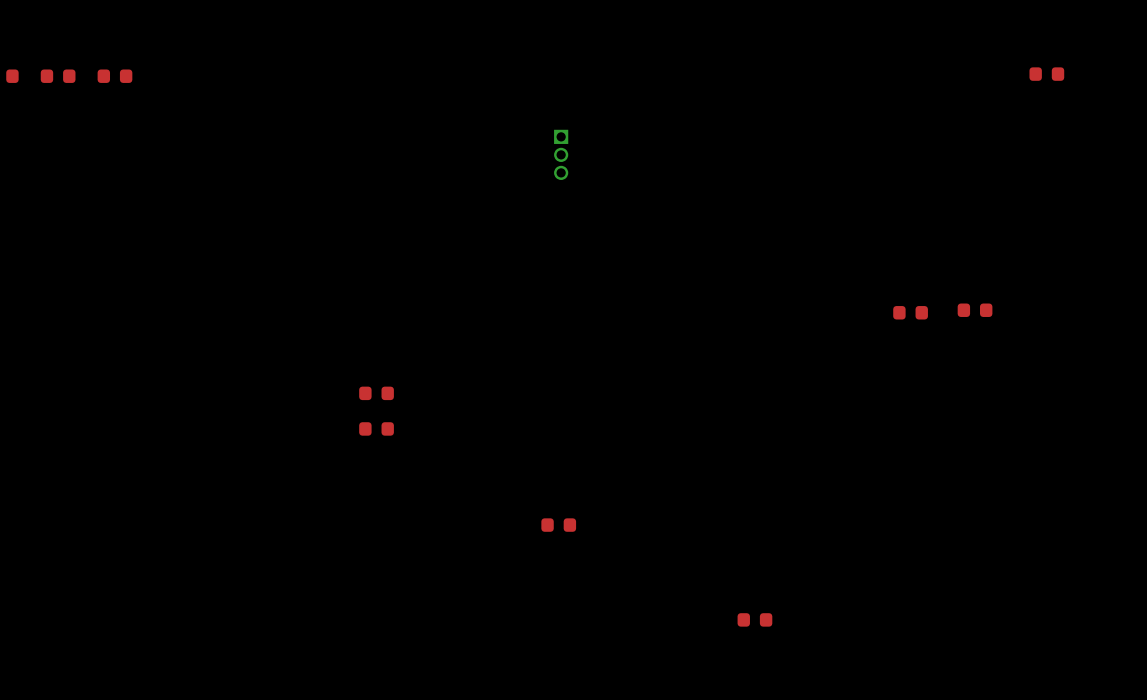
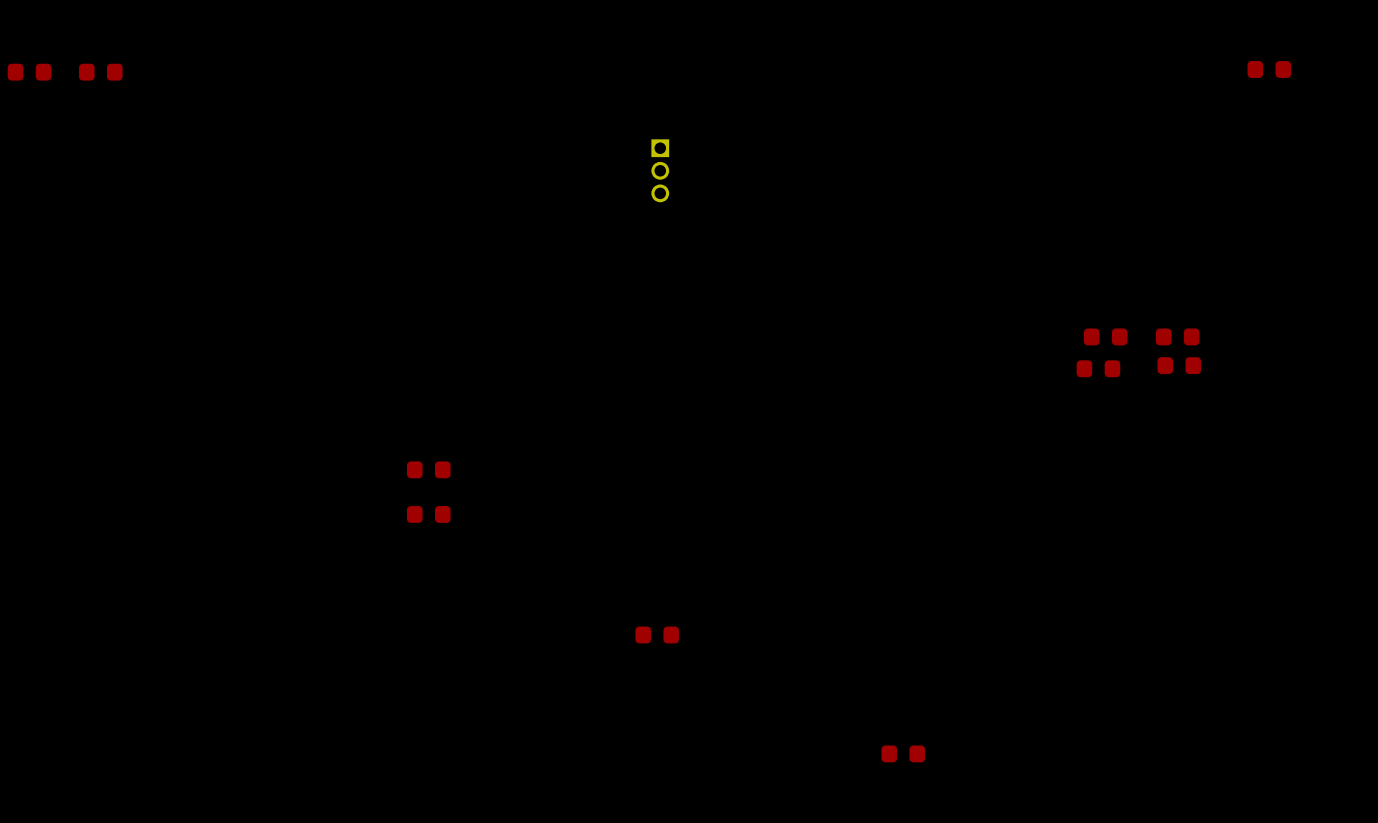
part: none -> (1105, 336)
part: none -> (1177, 336)

